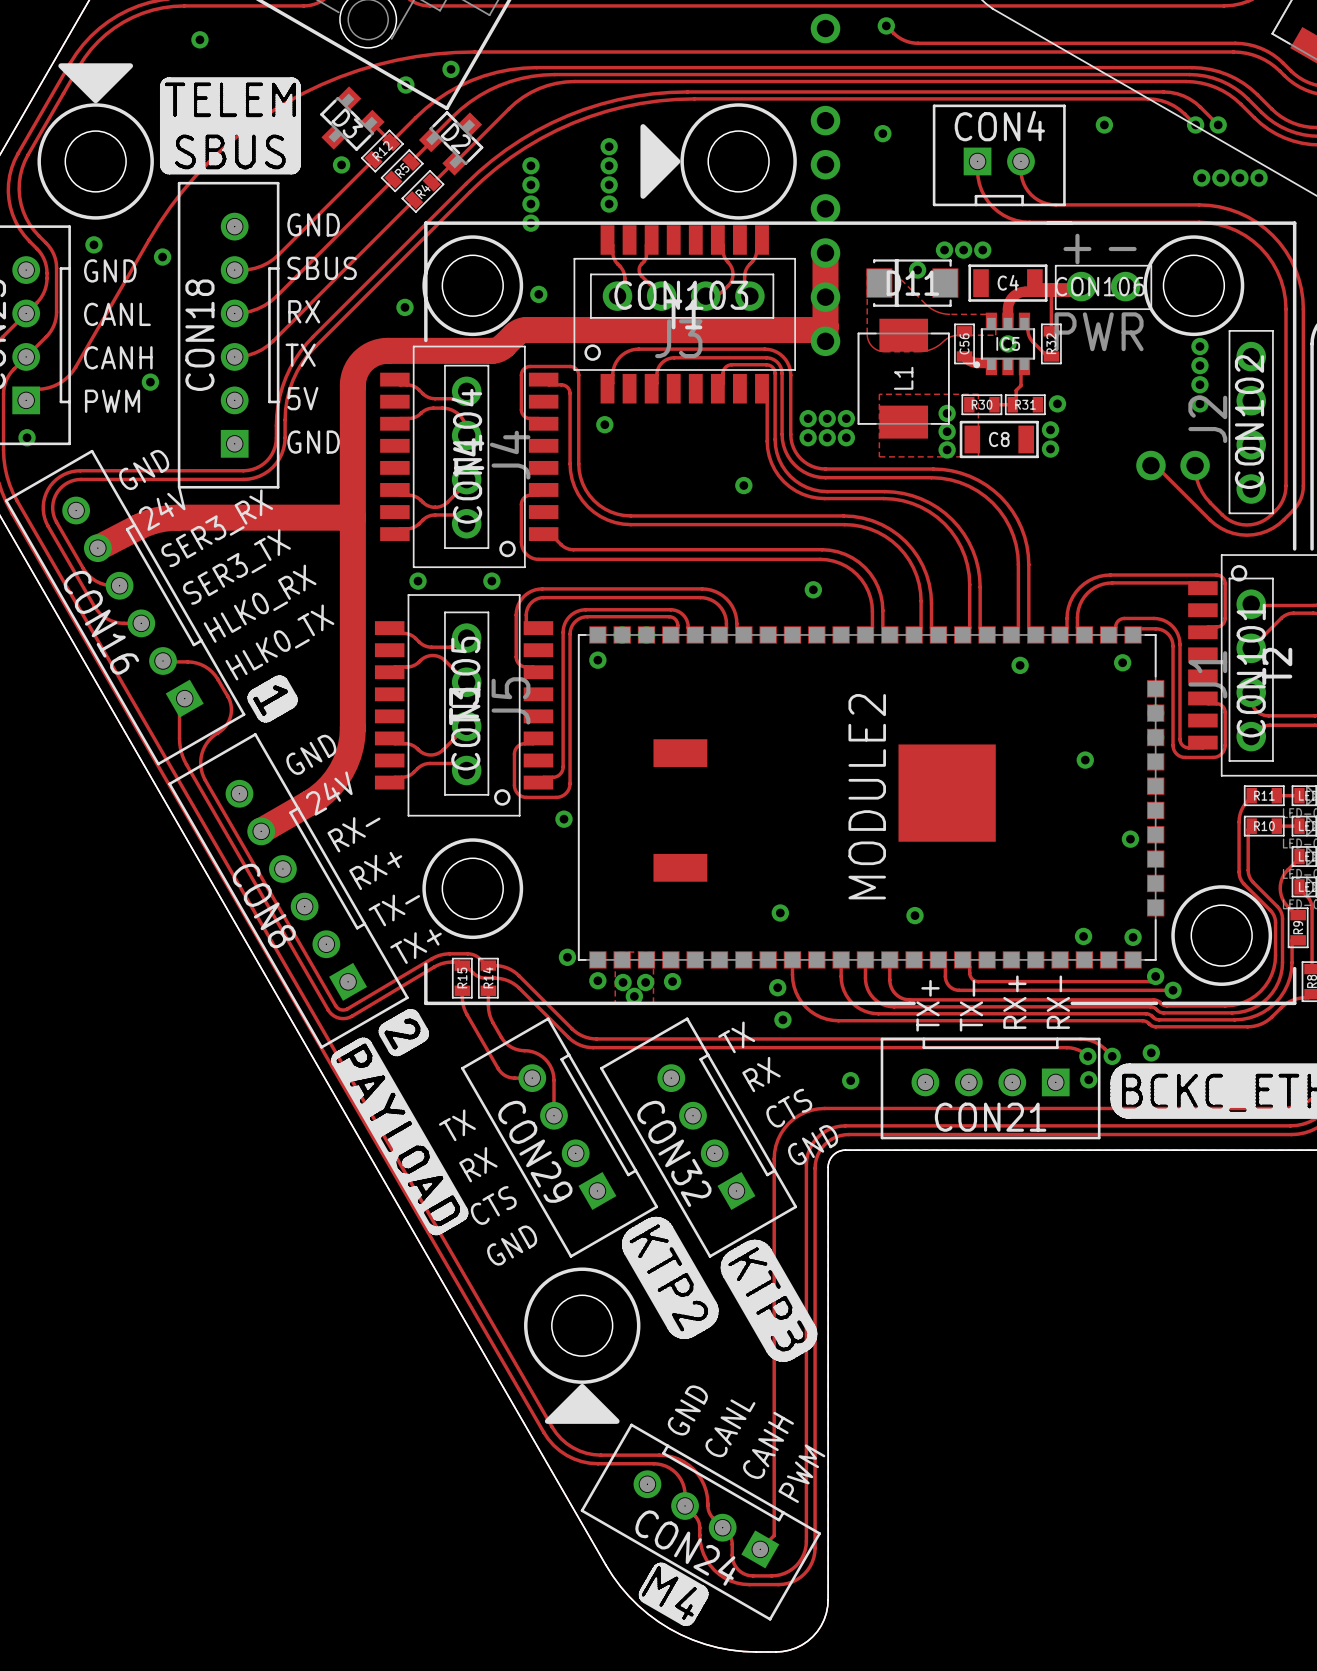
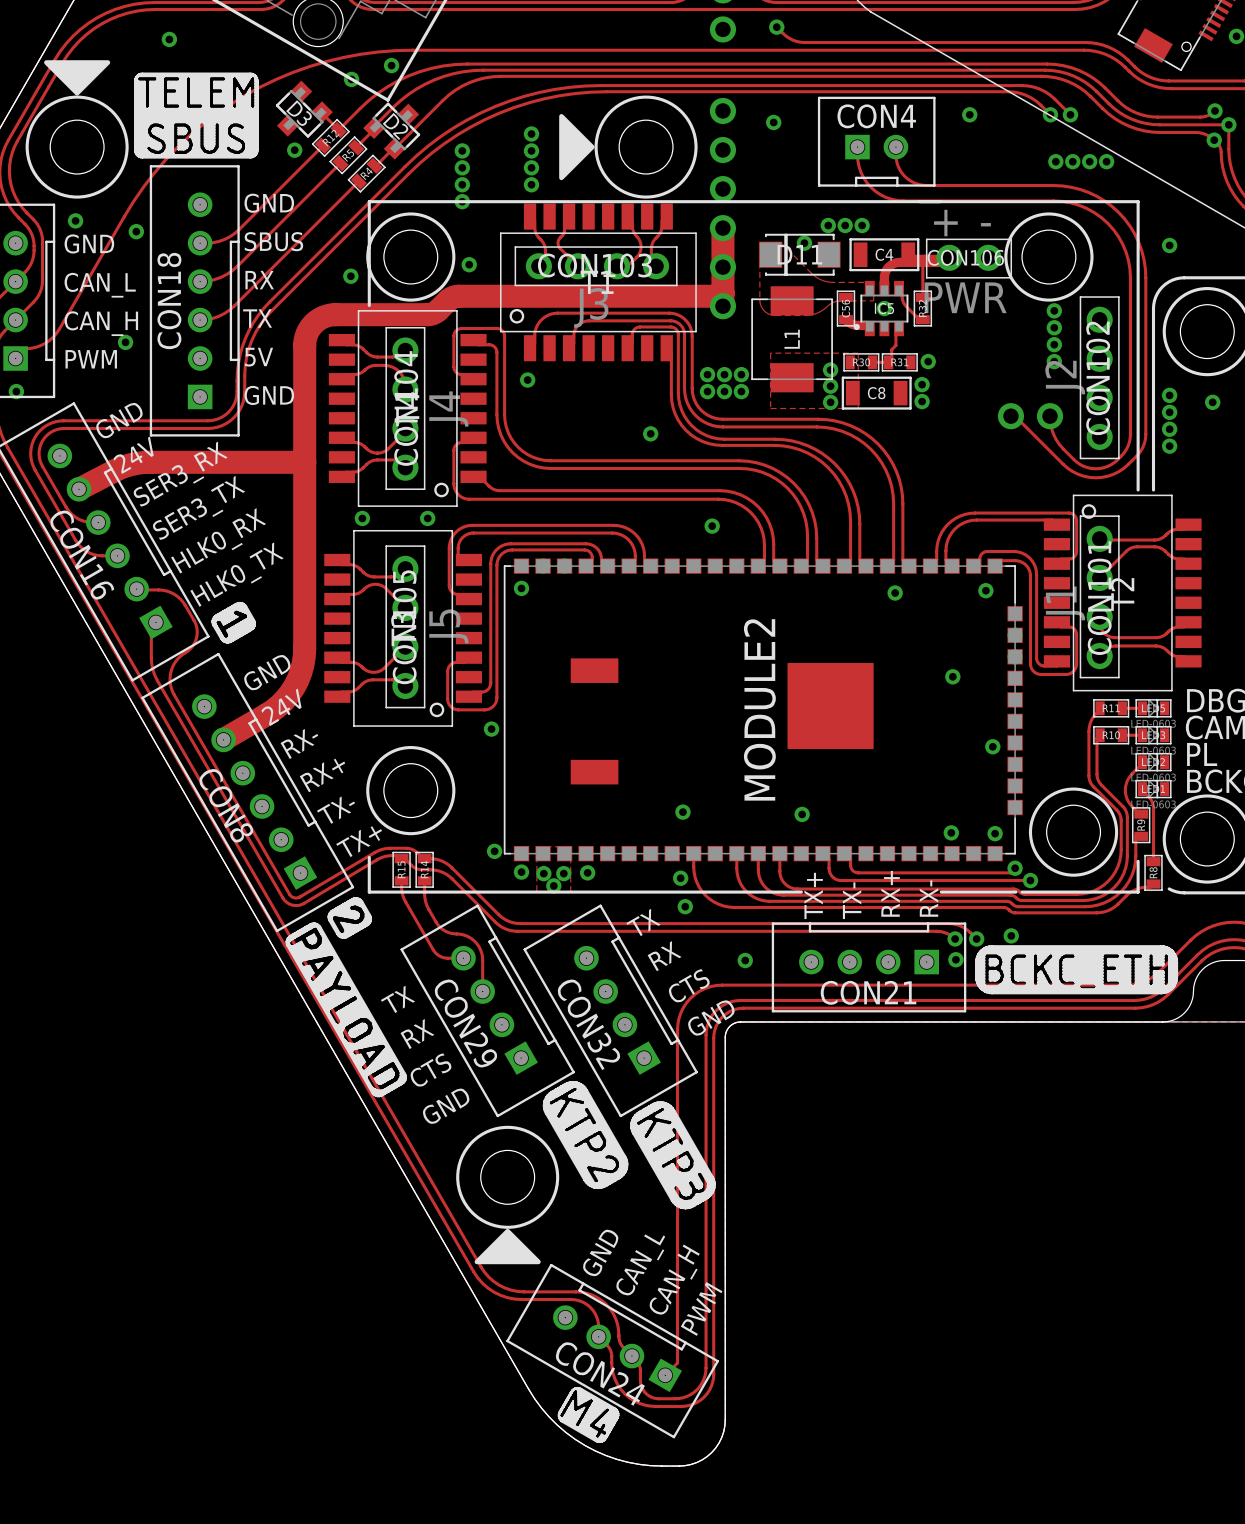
text: CANL (117, 314) -> CAN_L (100, 285)
text: CANH (118, 357) -> CAN_H (101, 323)
text: CANL (730, 1428) -> CAN_L (640, 1265)
text: CANH (768, 1445) -> CAN_H (674, 1279)

